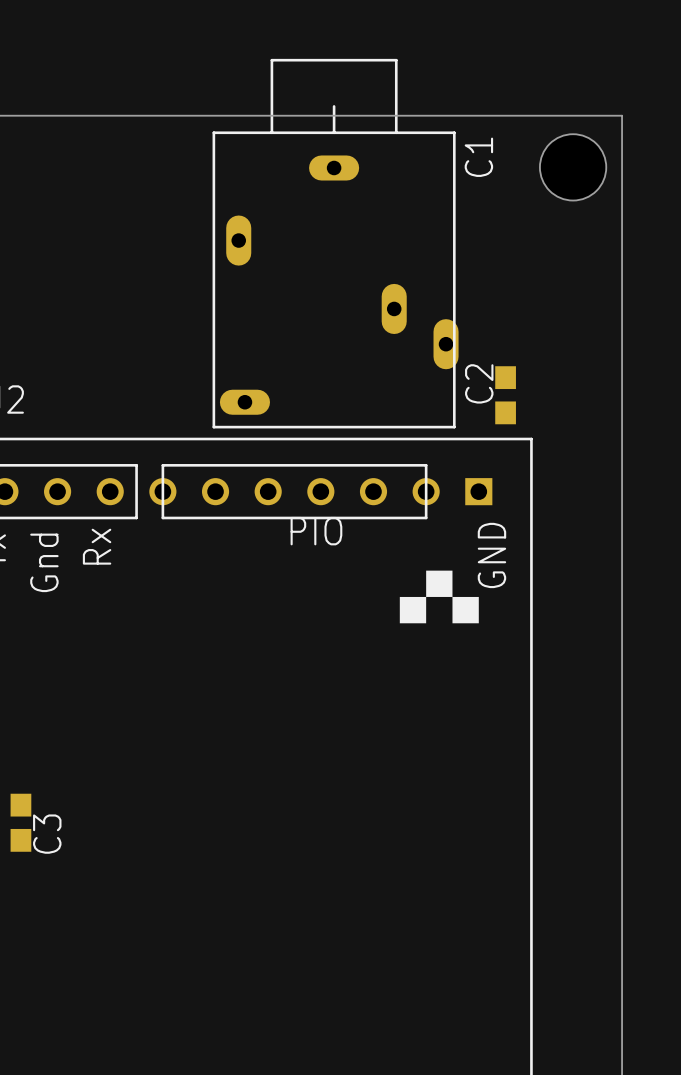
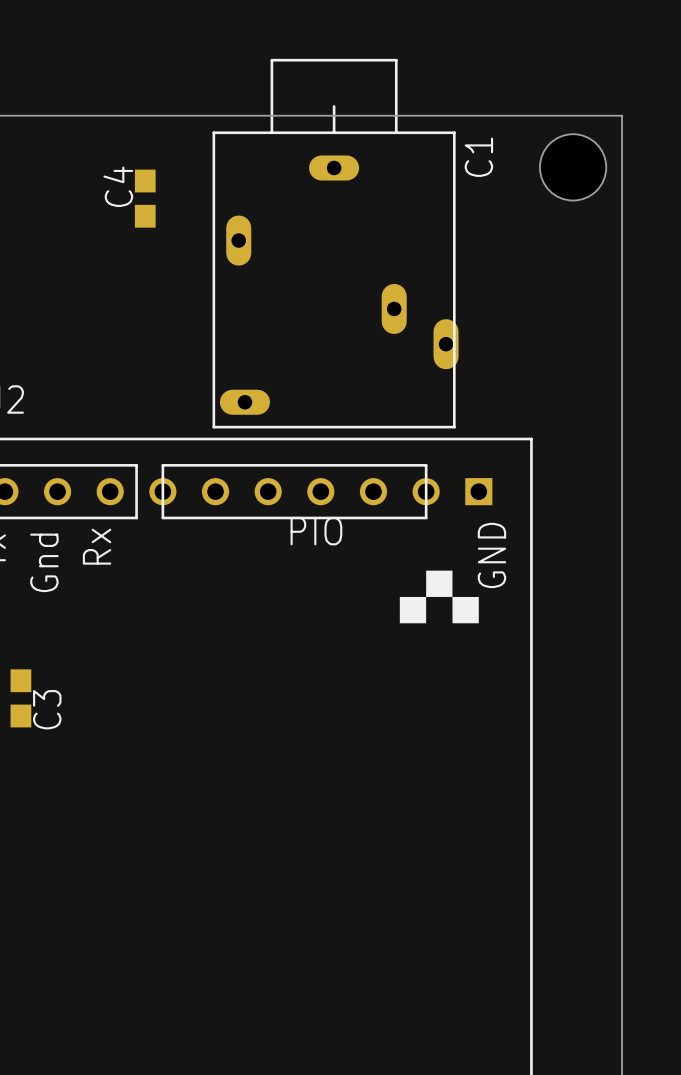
C4: none -> (145, 198)
C2: (505, 395) -> none
C3 position: (20, 822) -> (20, 698)

